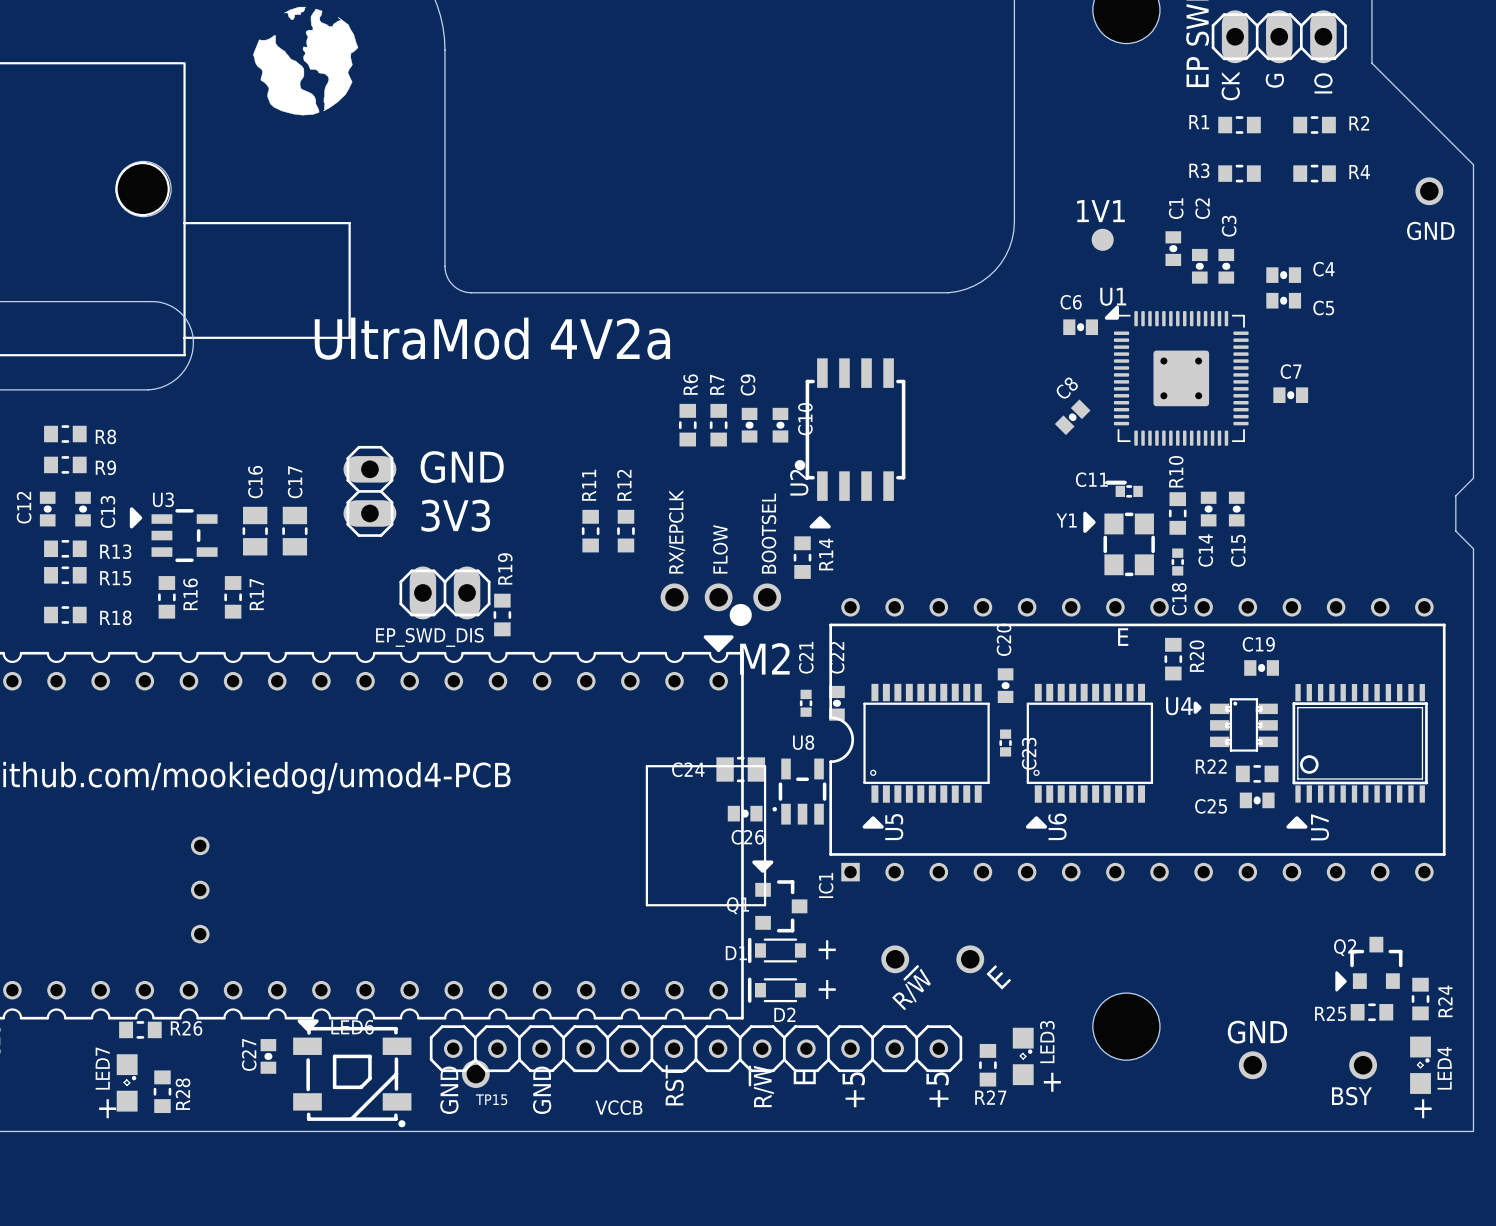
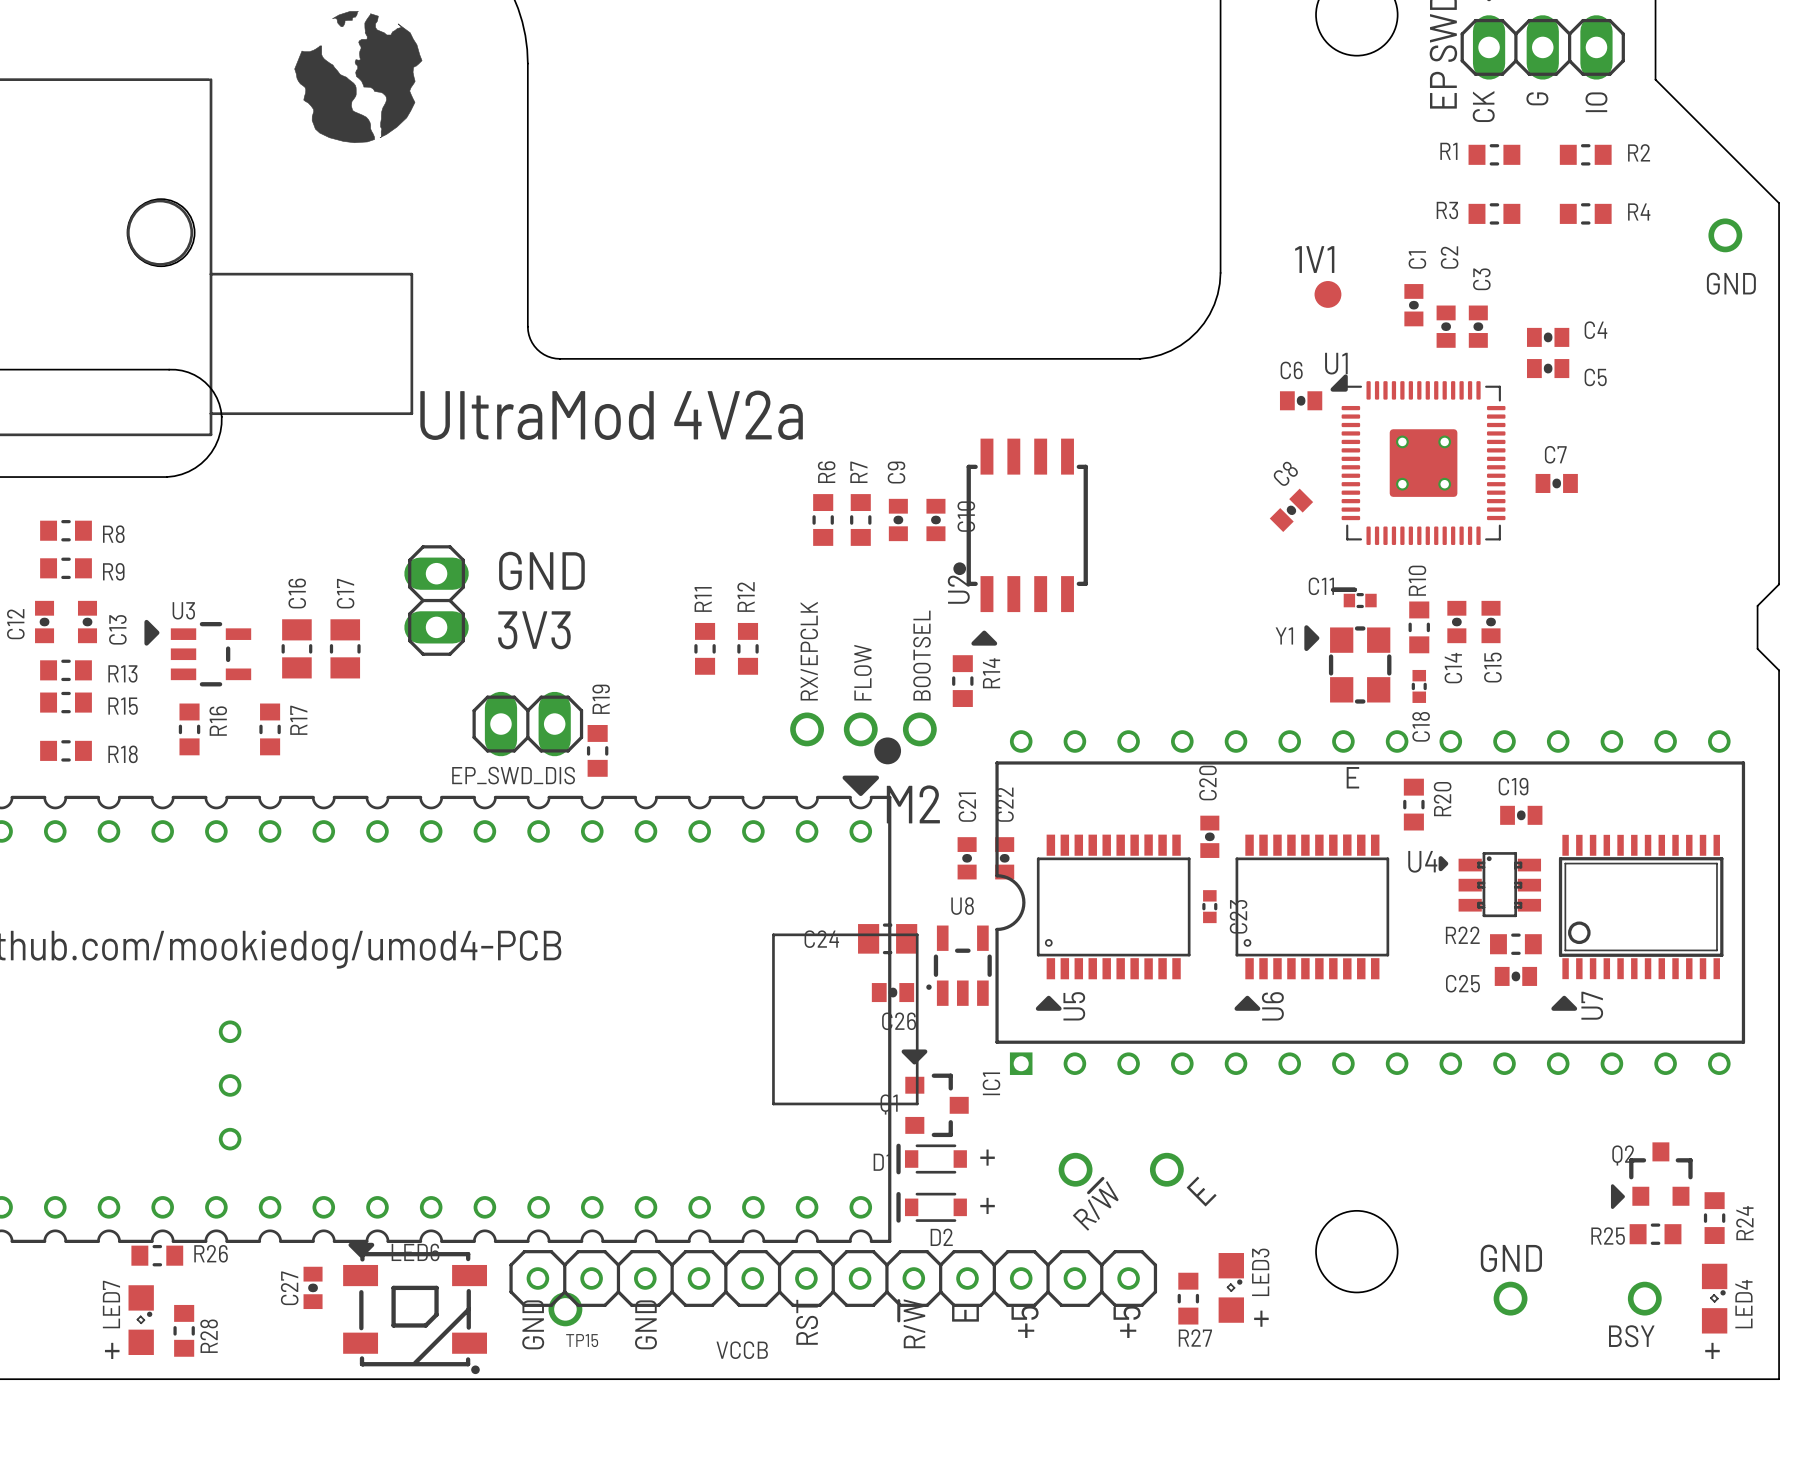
C21 footprint: [799, 689, 813, 717] -> [957, 837, 977, 880]

